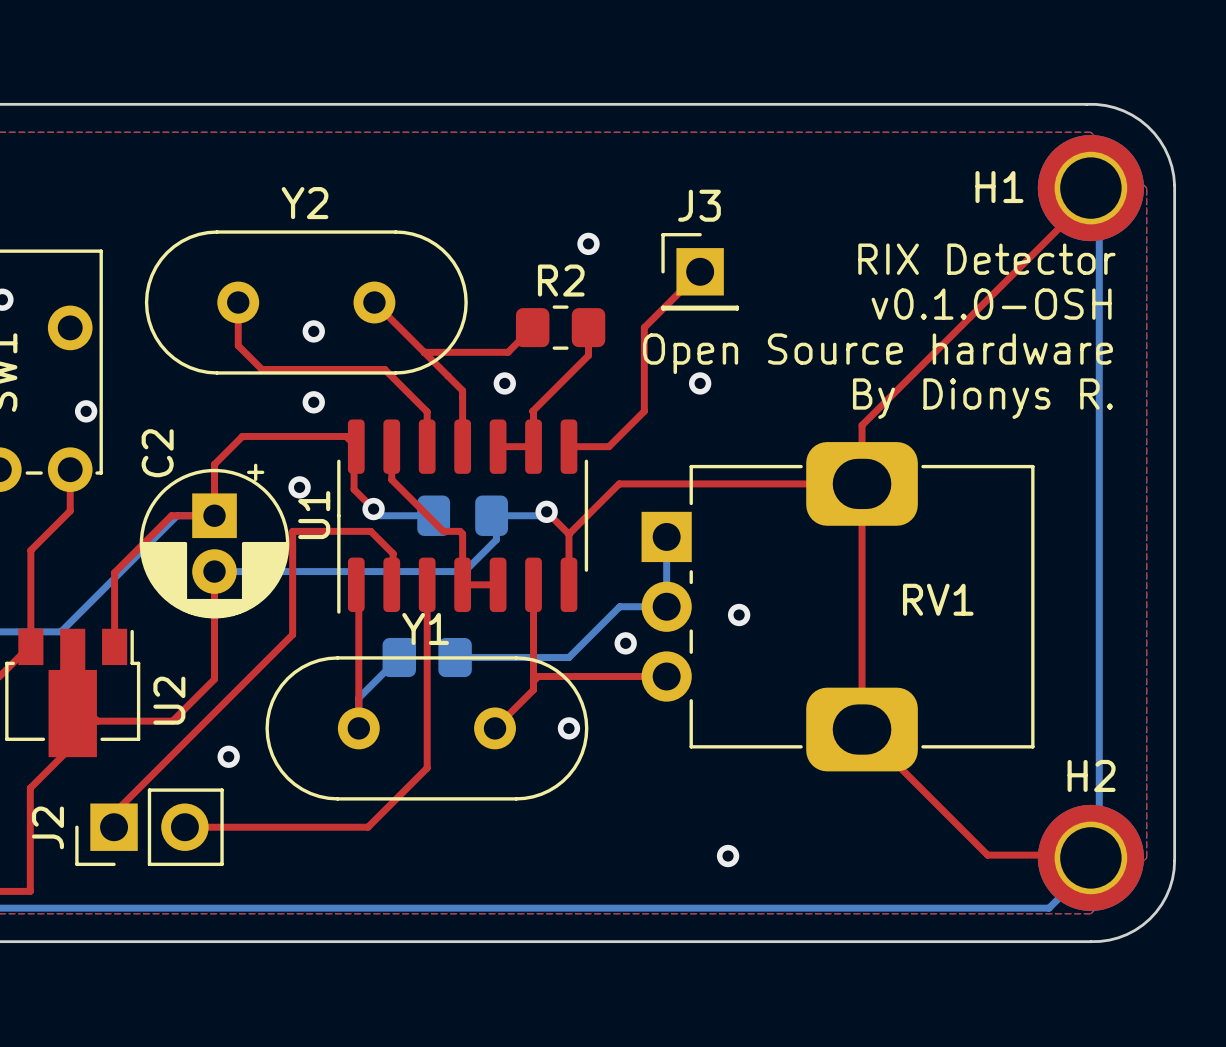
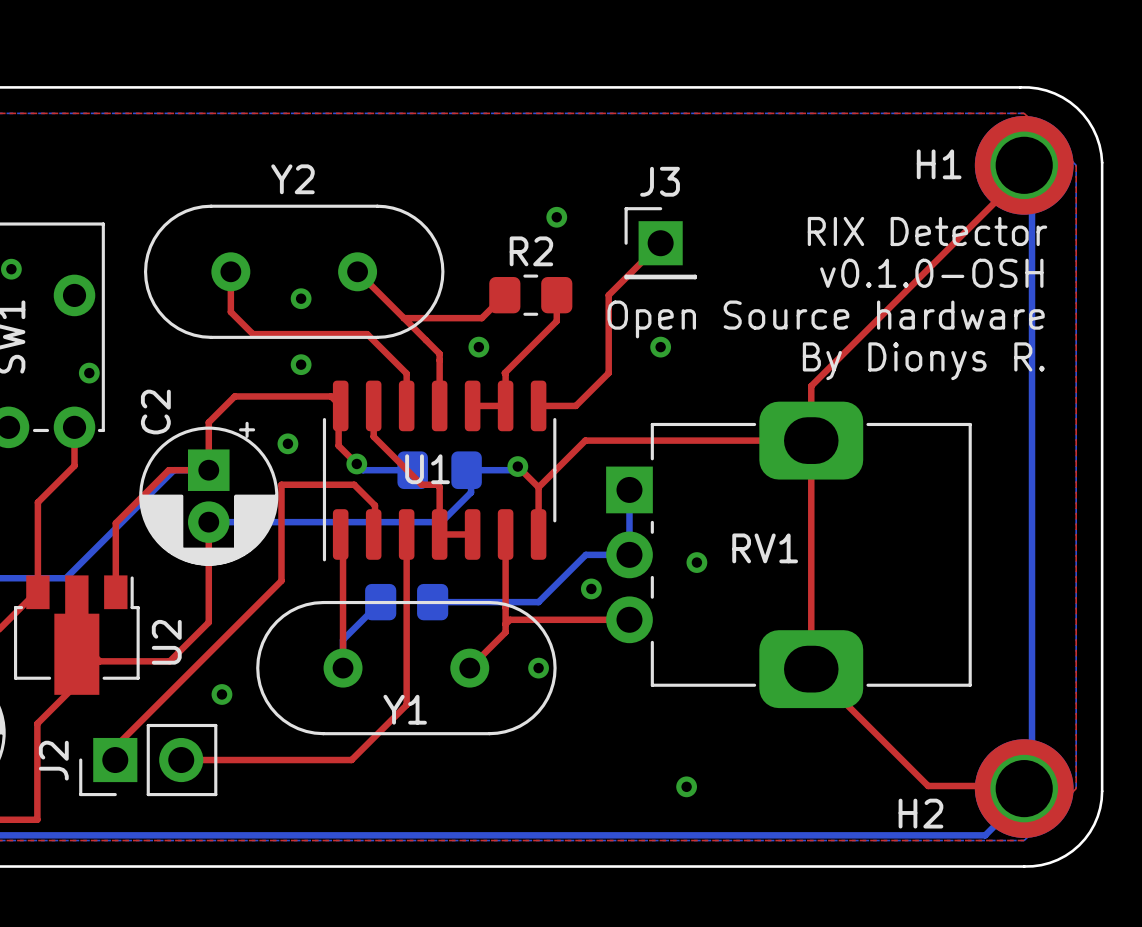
U1 name rotation: 0° (314, 515) -> 90° clockwise (427, 469)
U1 name position: U1 (314, 515) -> U1 (427, 469)
RV1 name position: RV1 (938, 599) -> RV1 (765, 548)
Y1 name position: Y1 (425, 628) -> Y1 (405, 709)
H2 name position: H2 (1091, 775) -> H2 (920, 813)

